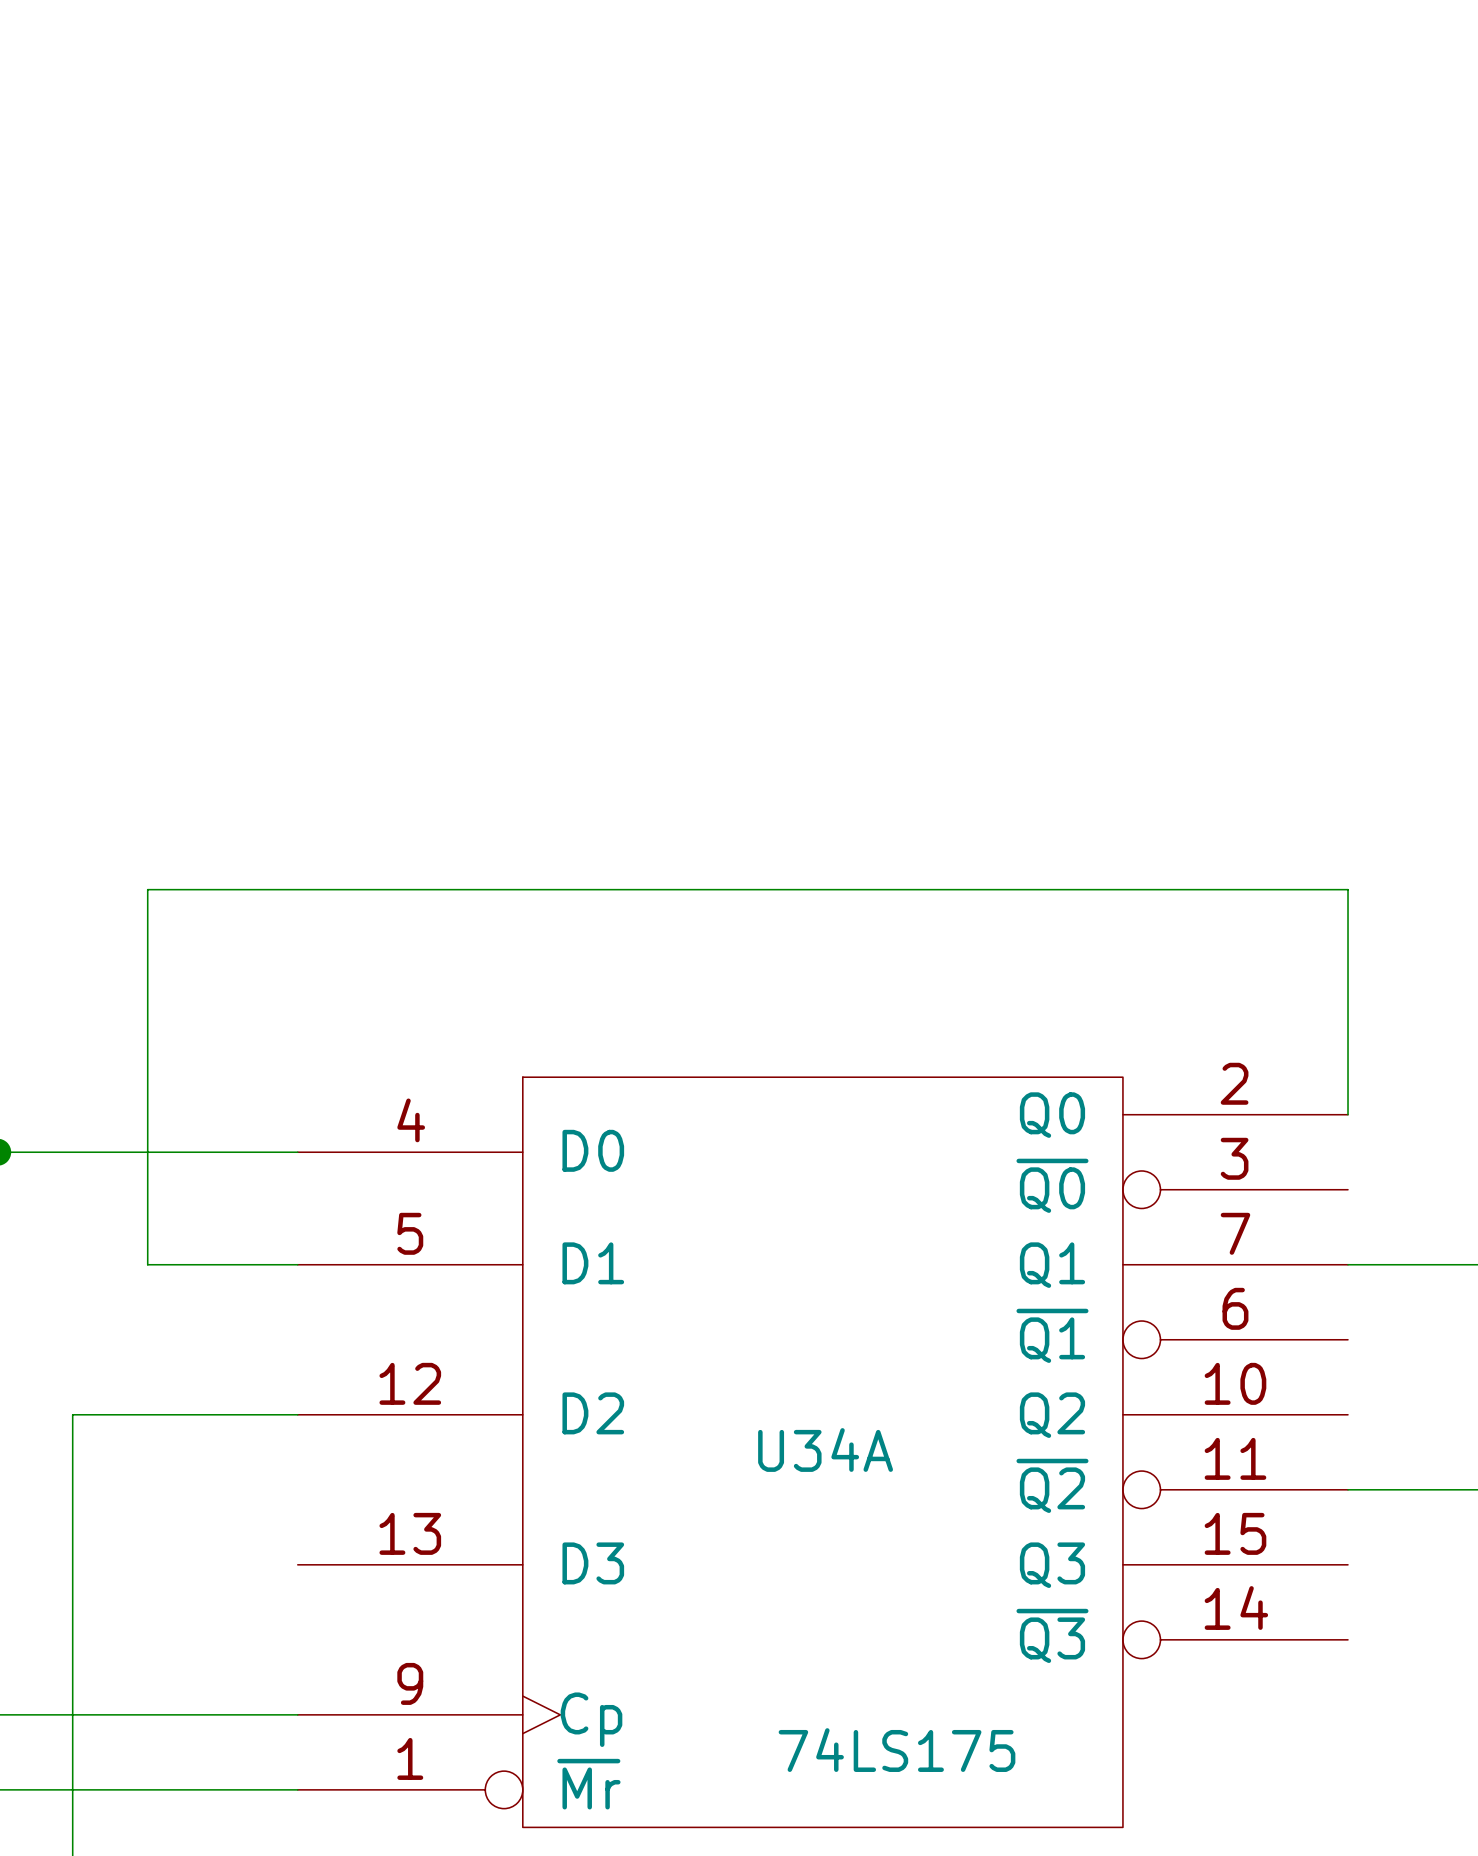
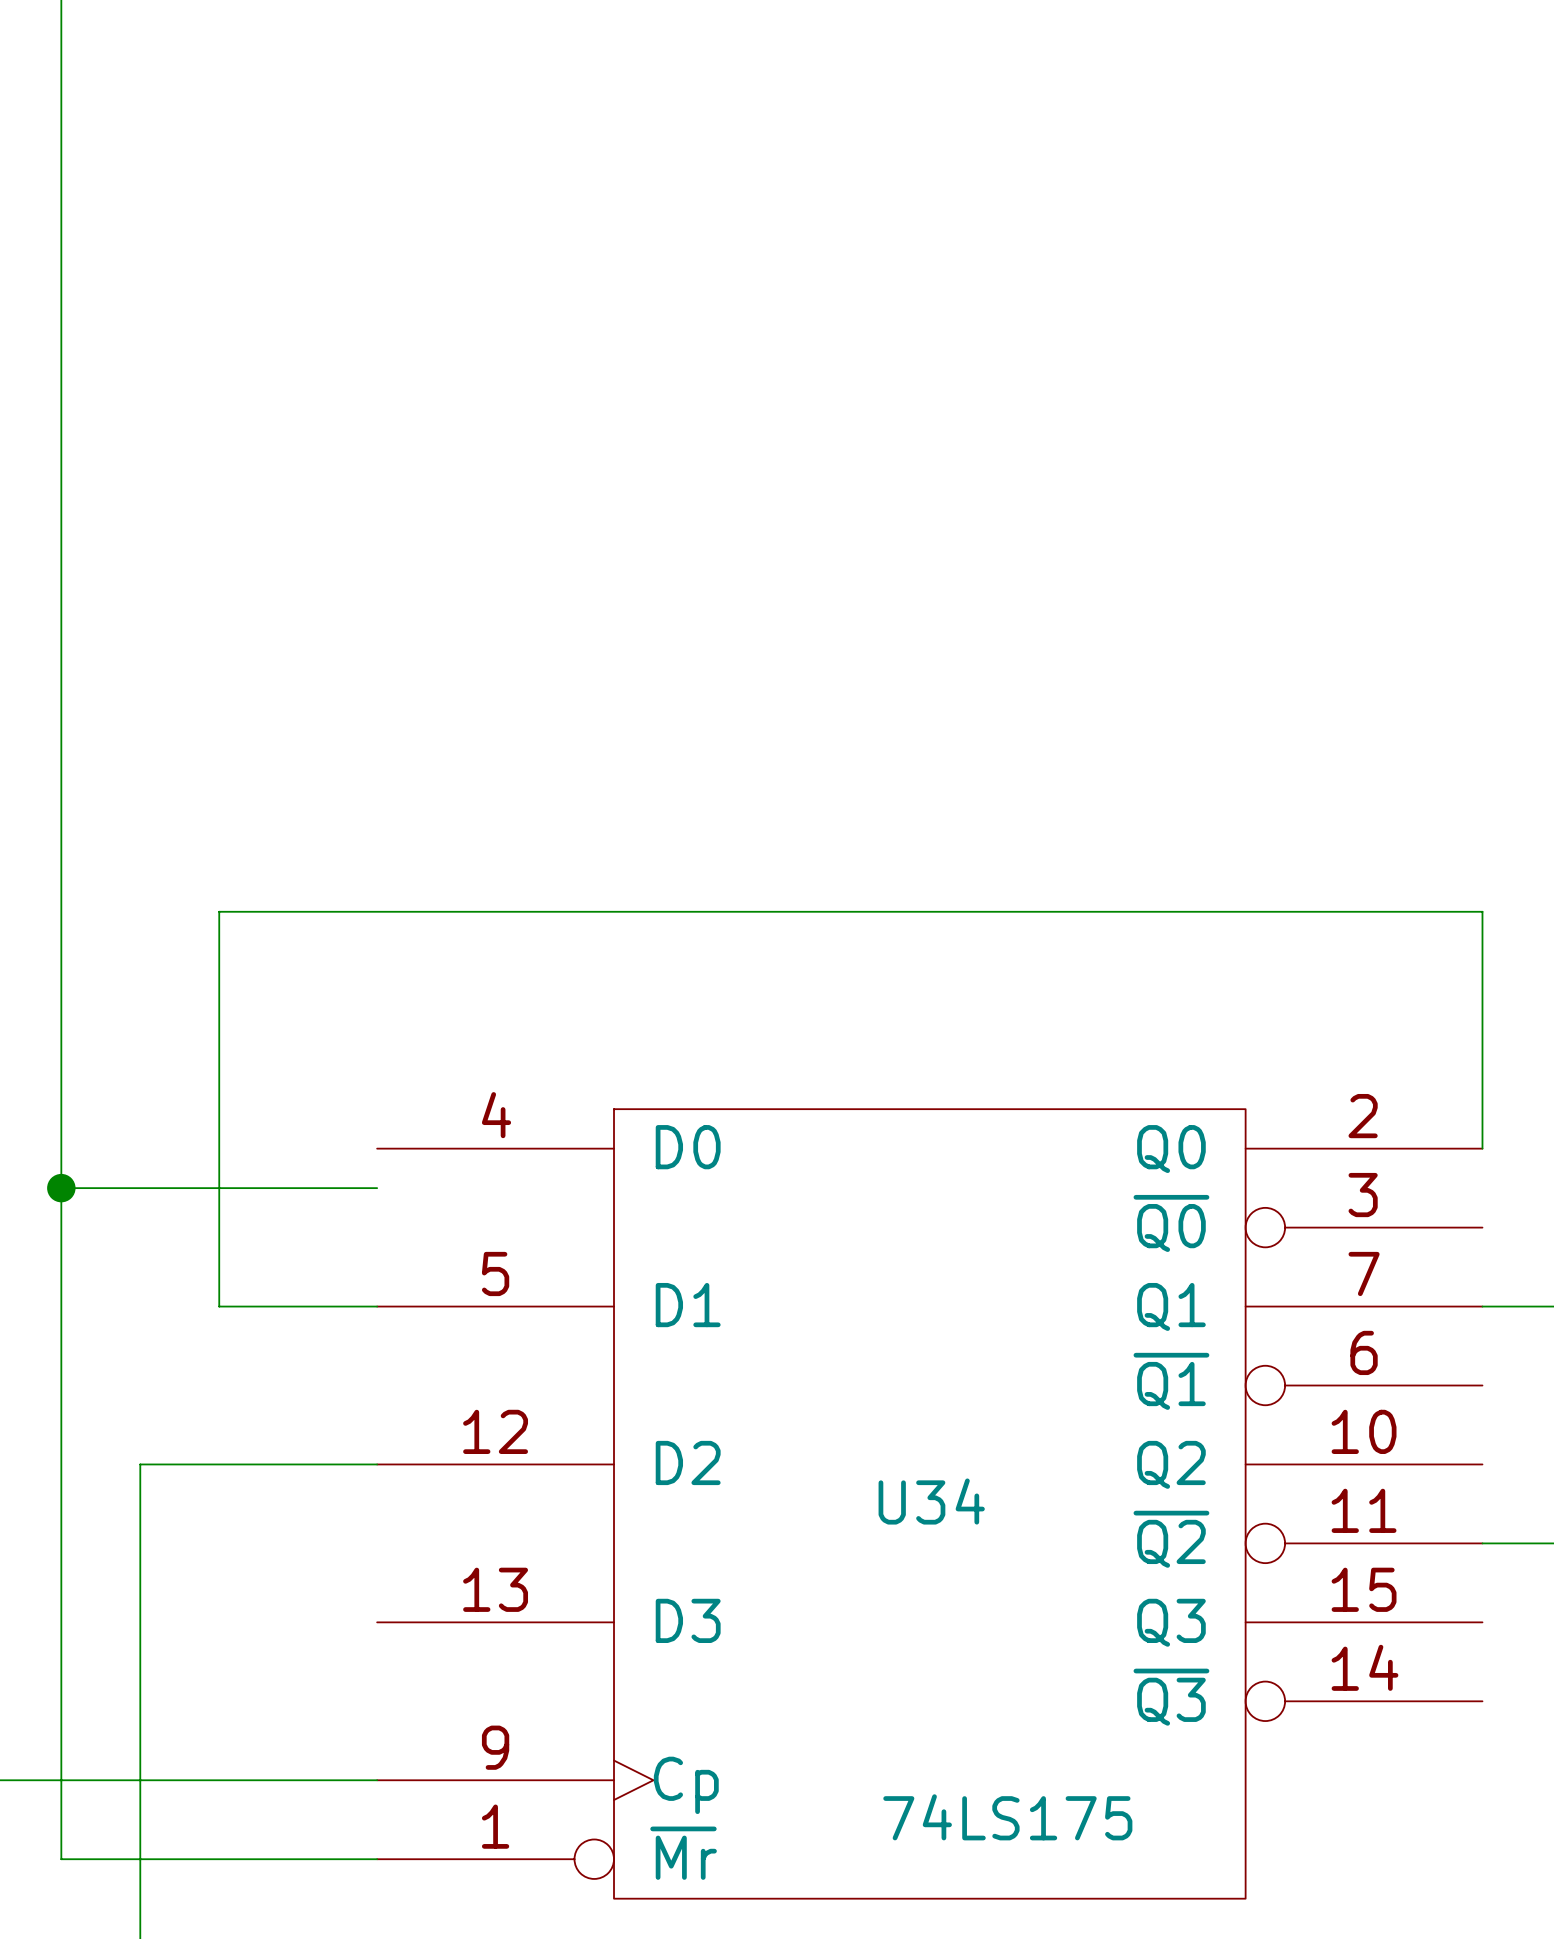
U34A: 74LS175 (822, 1452) -> none
U34: none -> 74LS175 (929, 1503)

